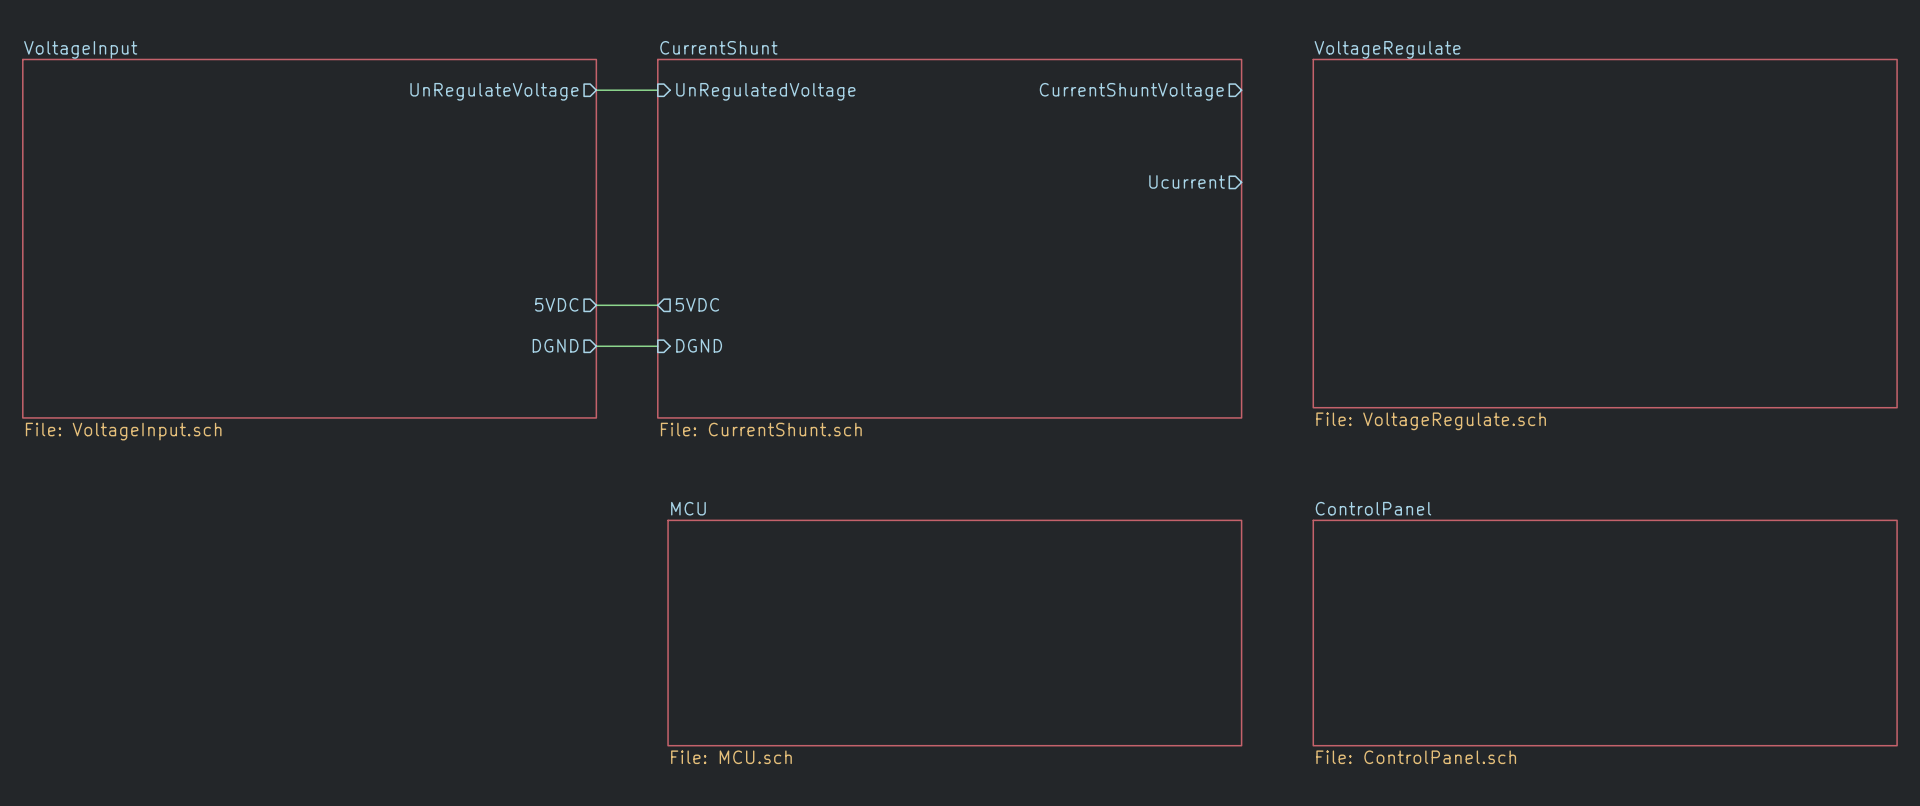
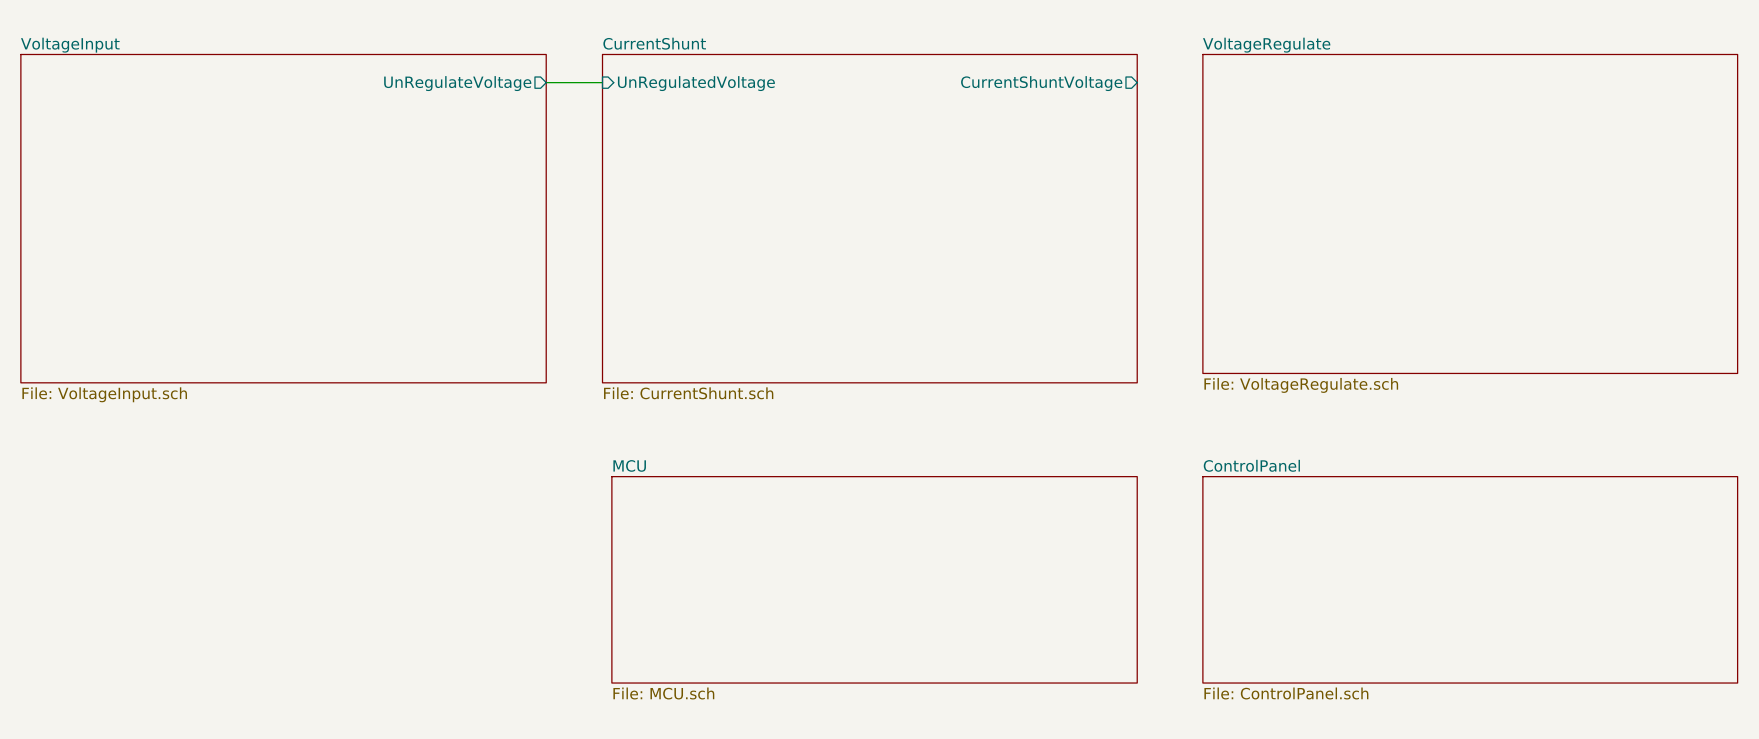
sheet pin: Ucurrent (1187, 181) -> none
sheet pin: 5VDC (556, 304) -> none
sheet pin: 5VDC (697, 304) -> none
wire: (596, 305) (657, 305) -> none
sheet pin: DGND (555, 345) -> none
sheet pin: DGND (699, 345) -> none
wire: (596, 346) (657, 346) -> none

